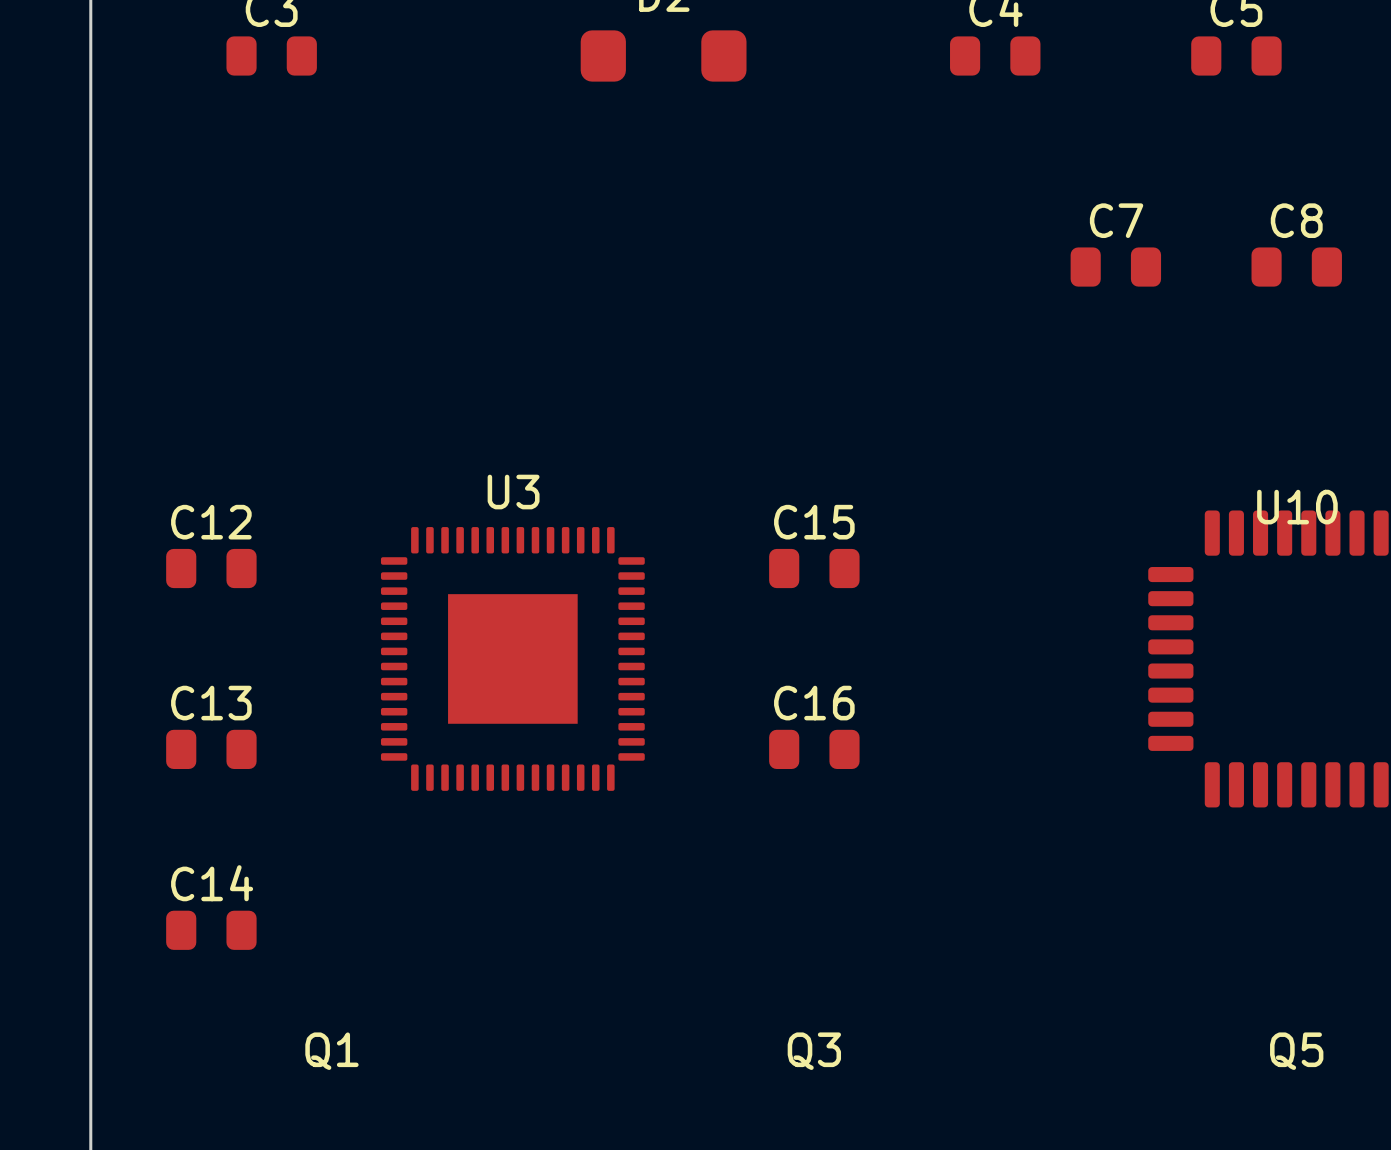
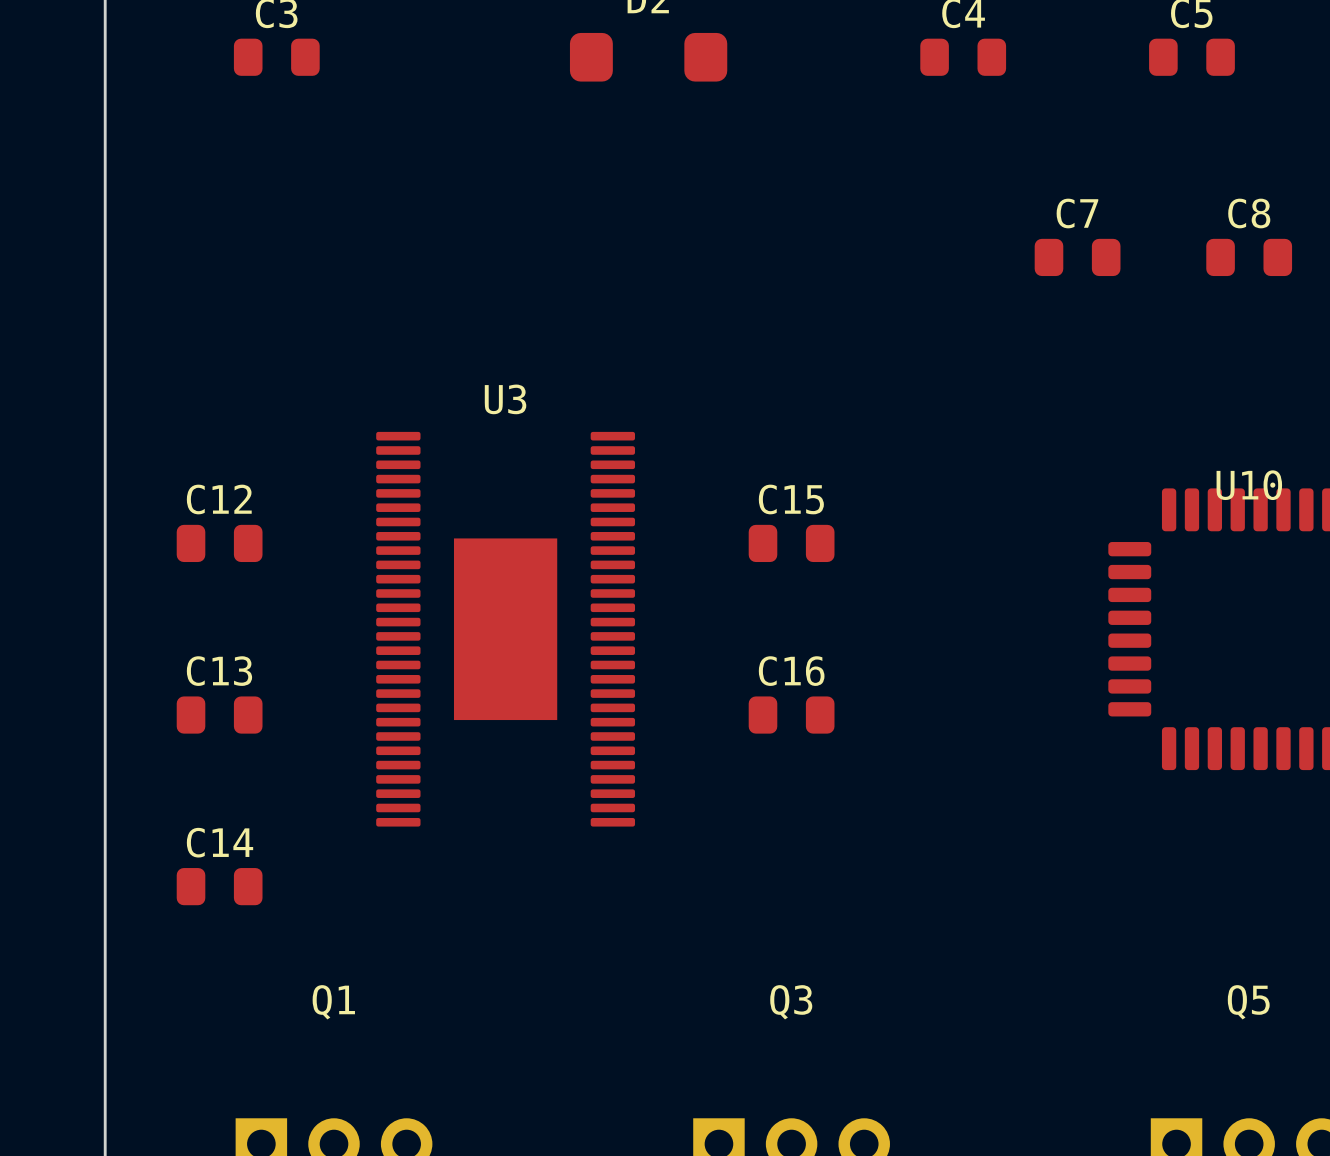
U3 name position: U3 (513, 492) -> U3 (505, 399)
U3 footprint: [380, 527, 645, 791] -> [376, 431, 636, 827]

